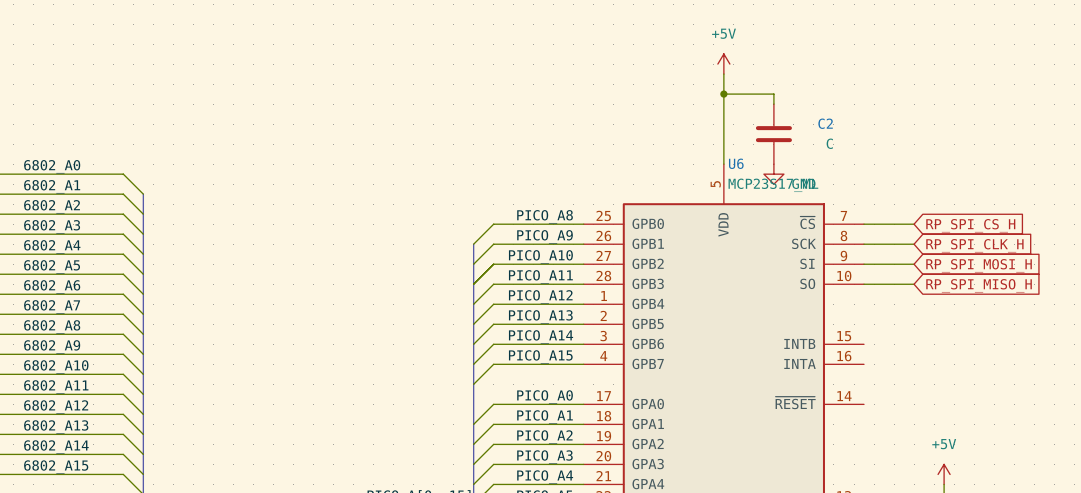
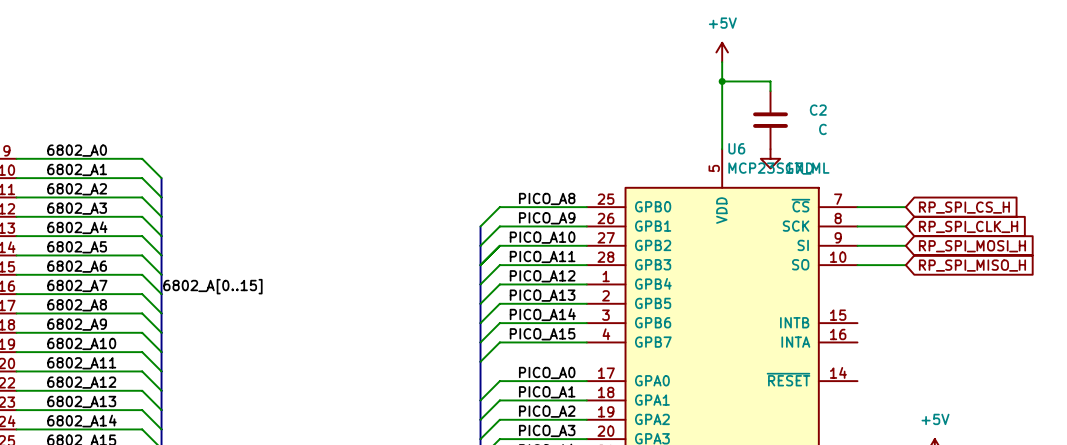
label: none -> 6802_A[0..15] (212, 286)

